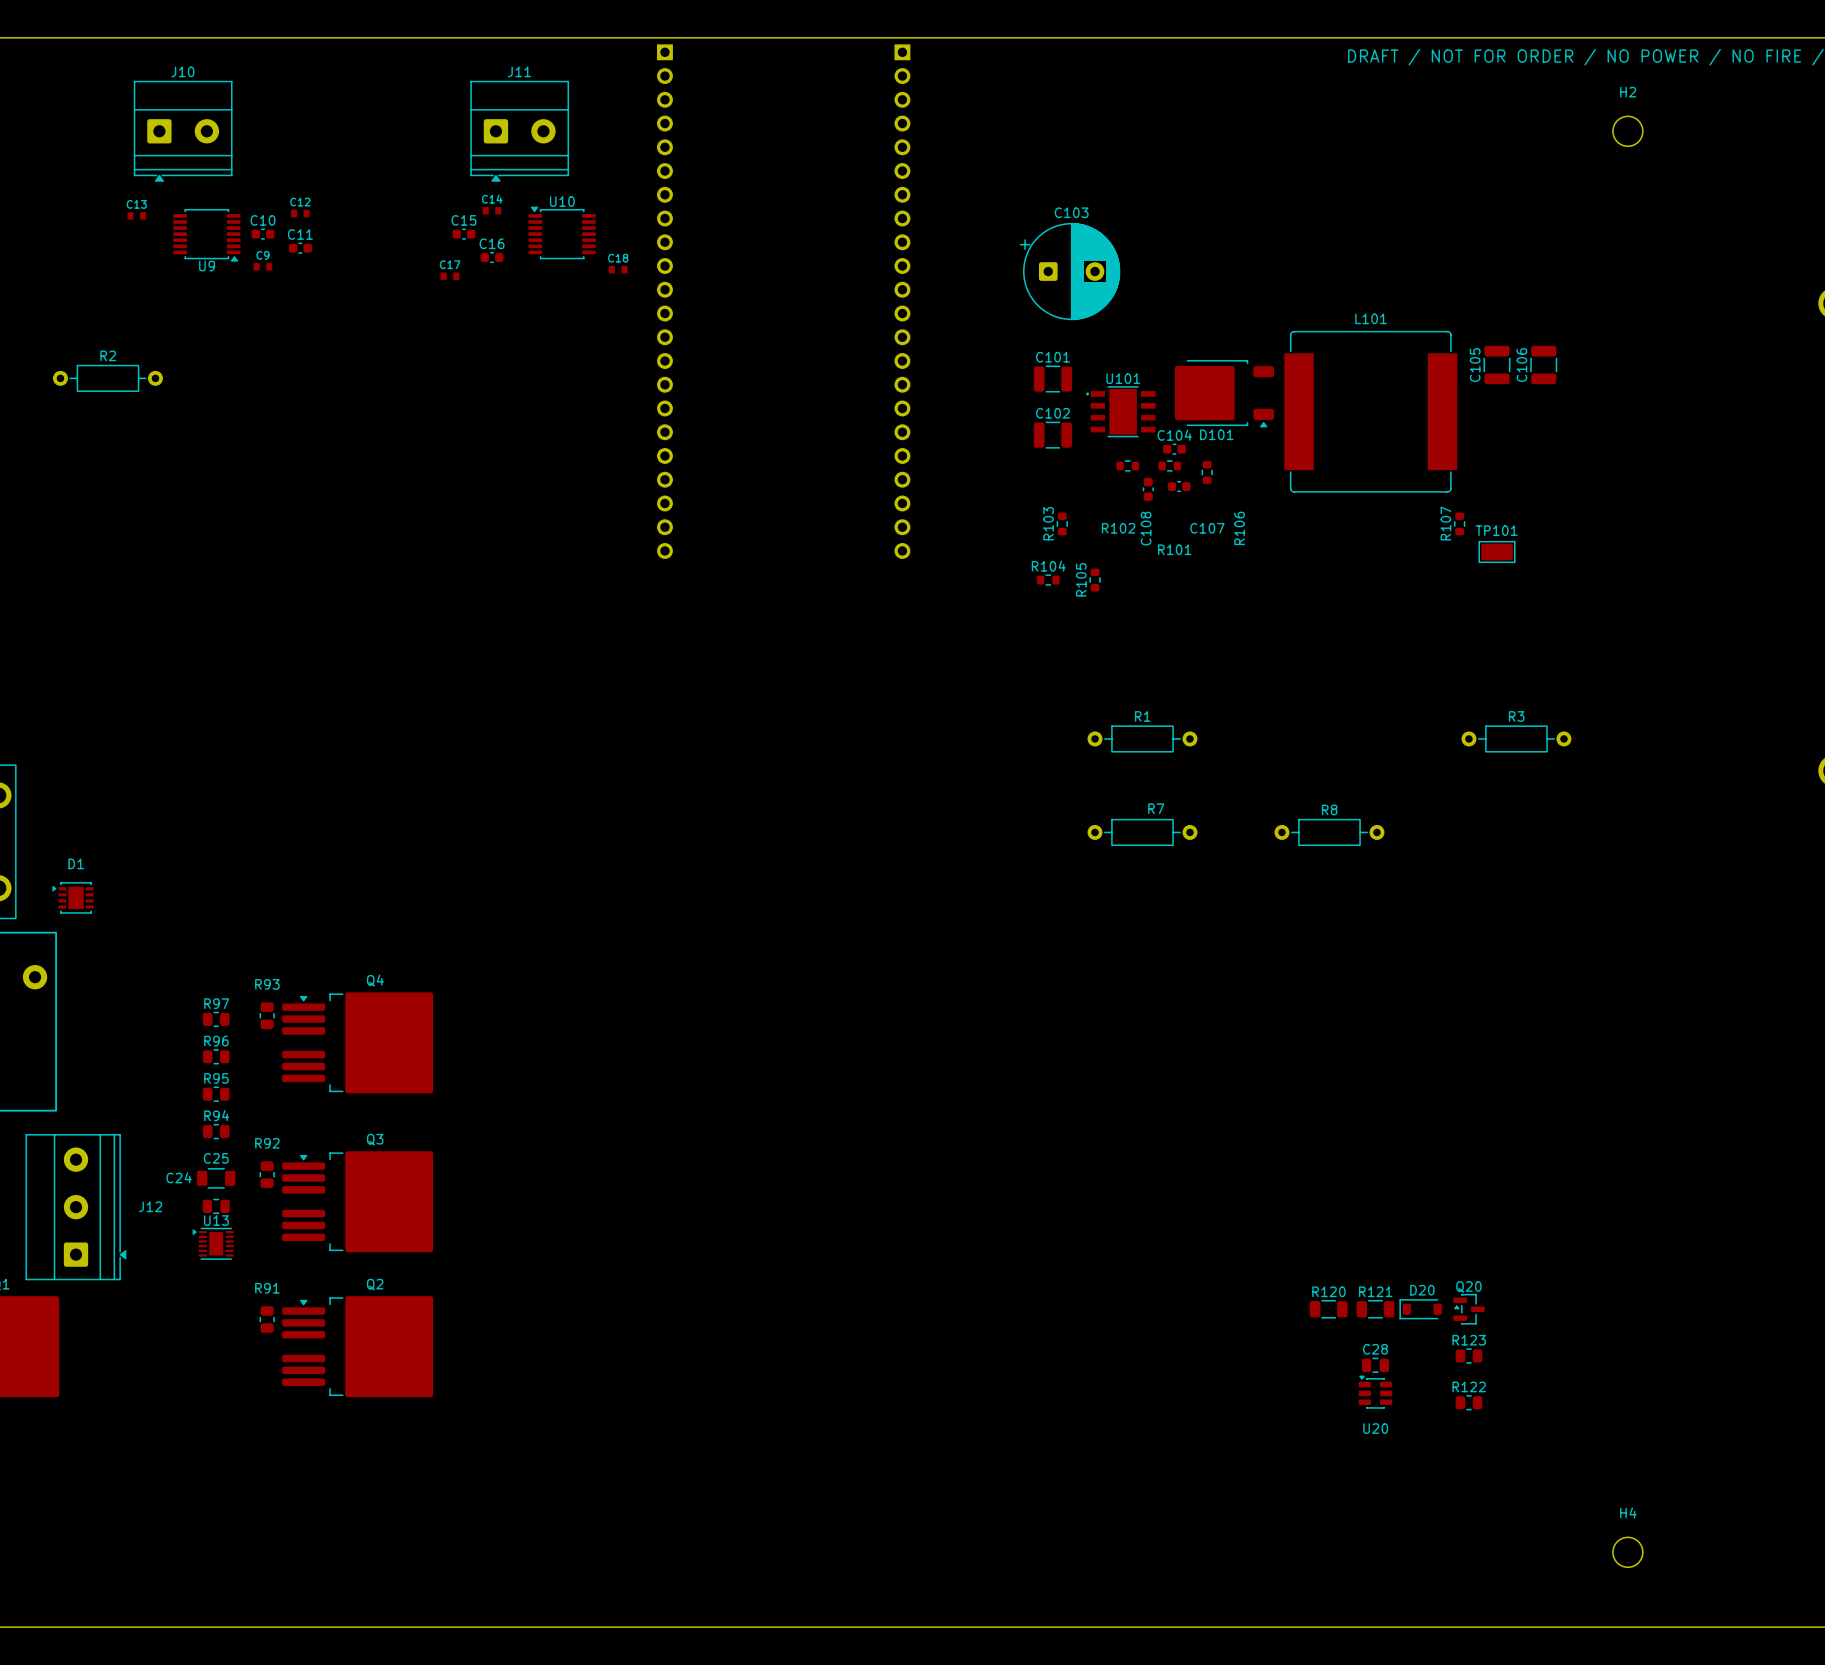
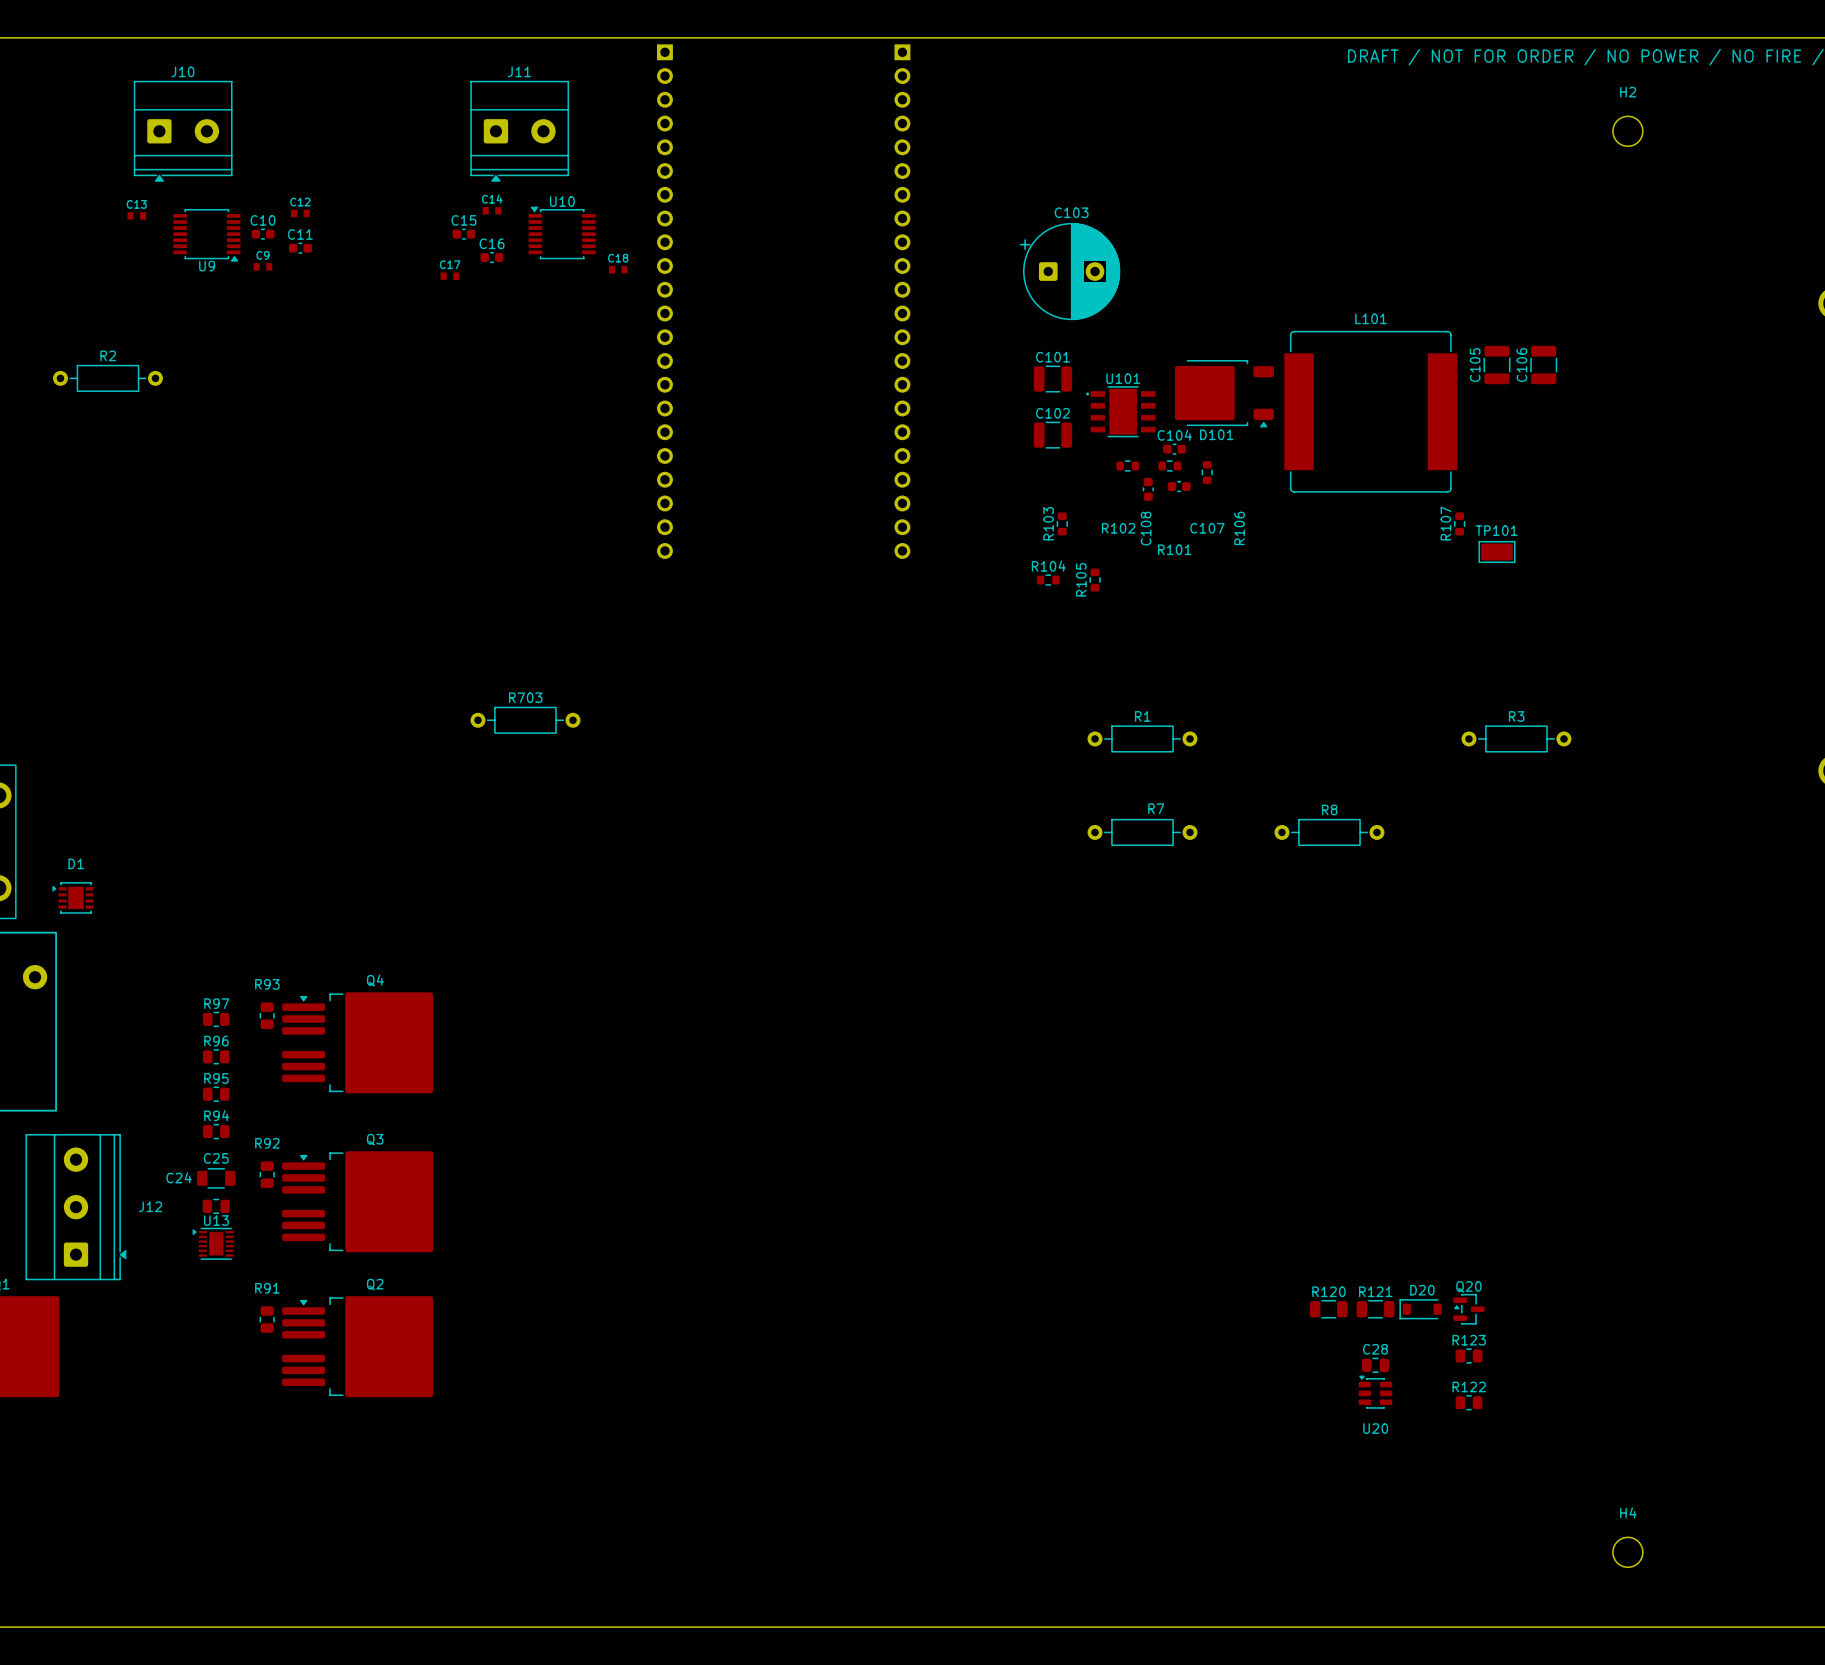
R703: none -> (525, 720)

